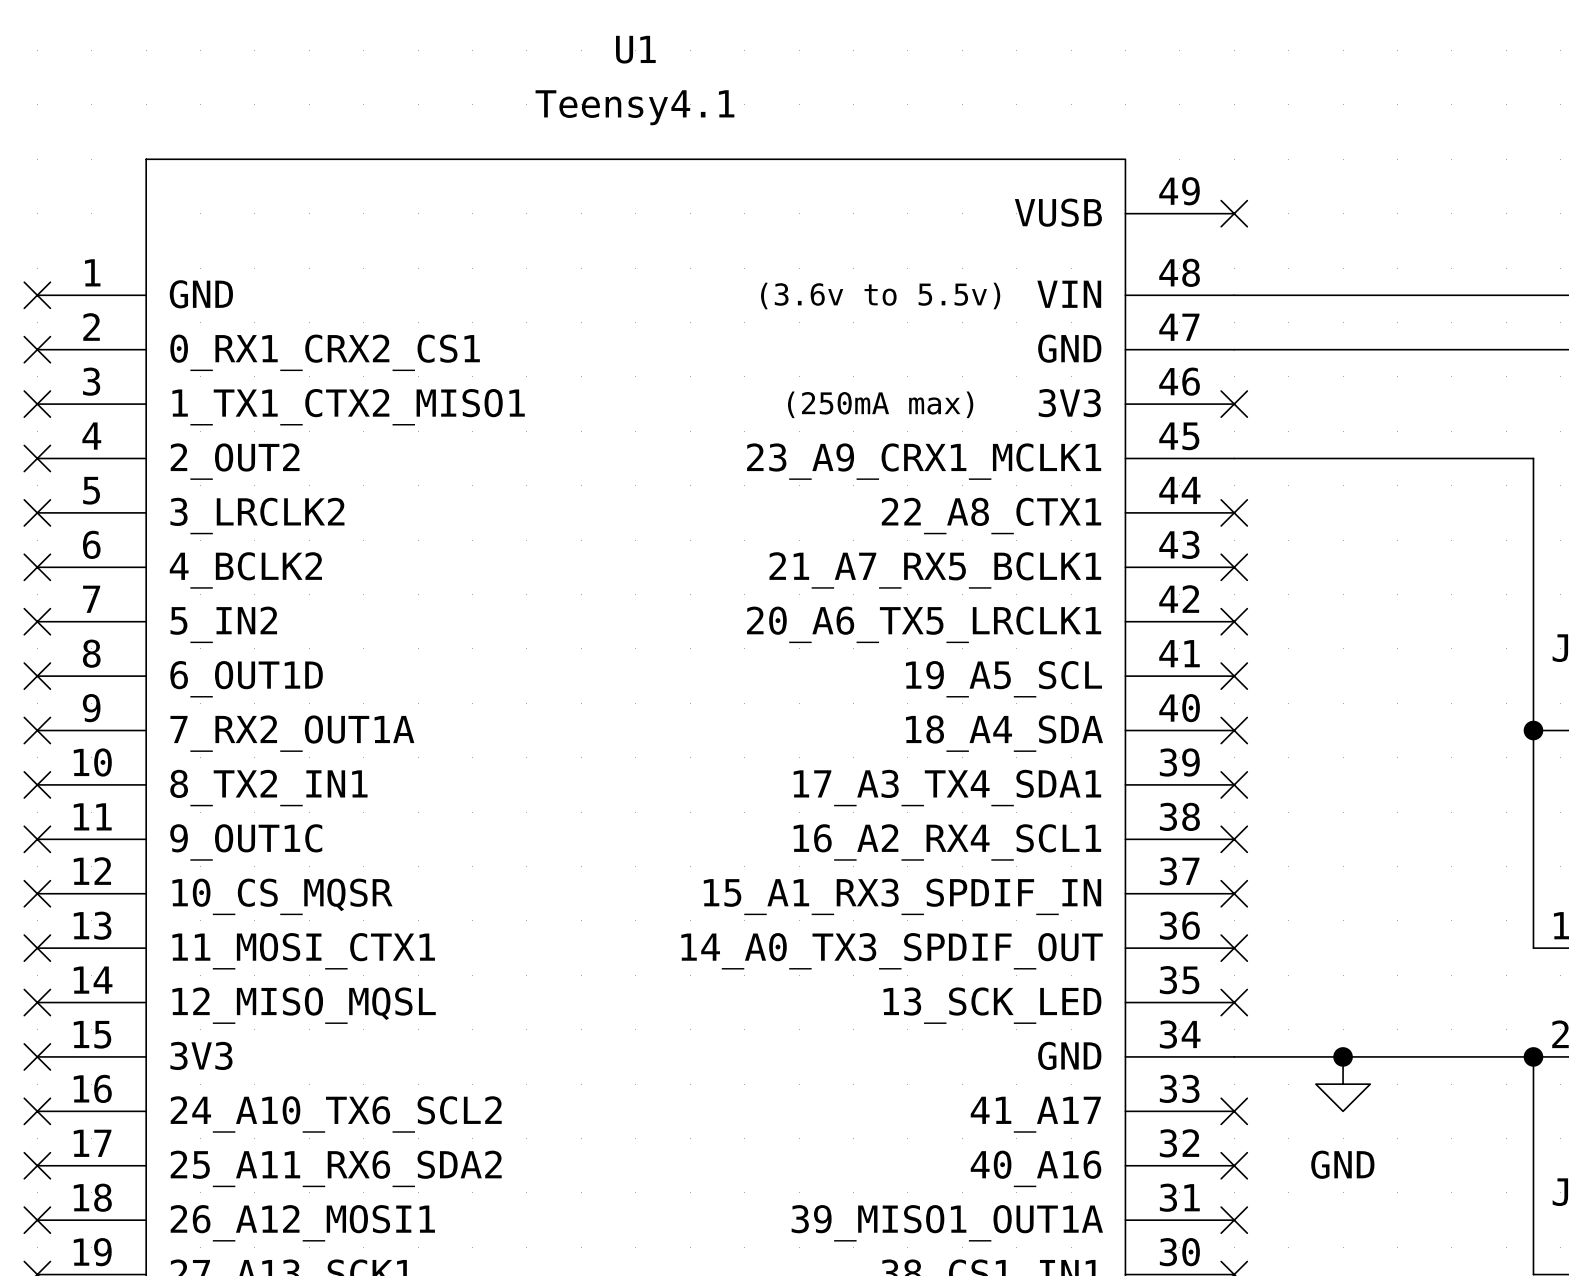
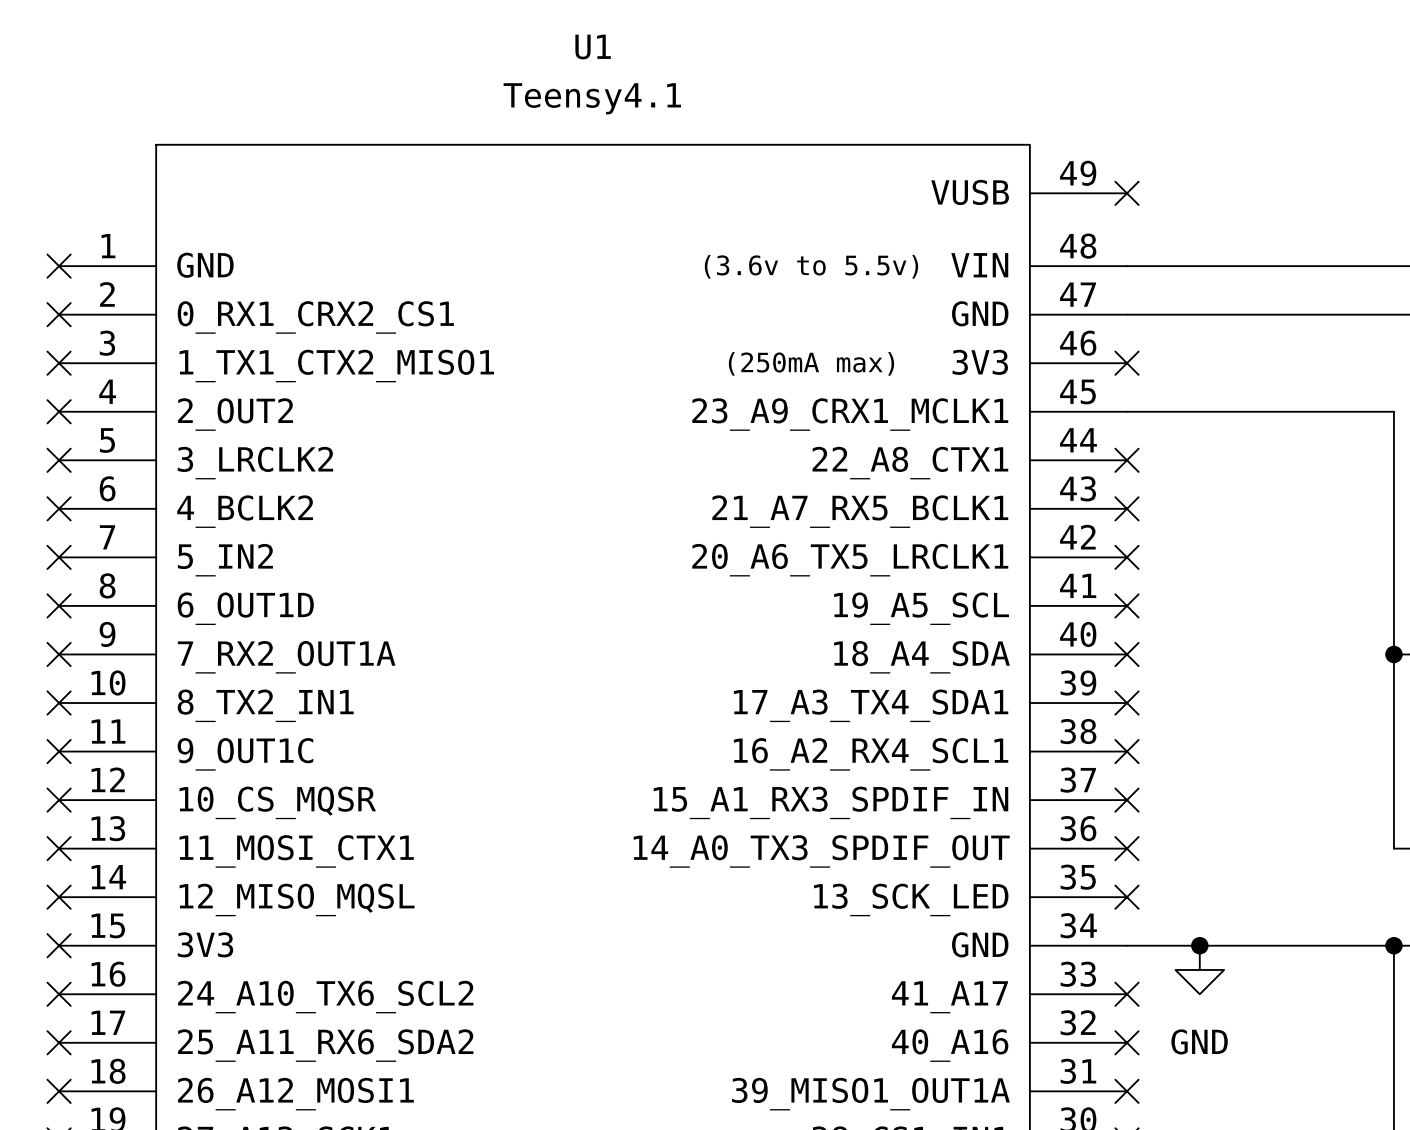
junction position: (1343, 1056) -> (1199, 945)
power symbol position: GND (1343, 1084) -> GND (1199, 969)

